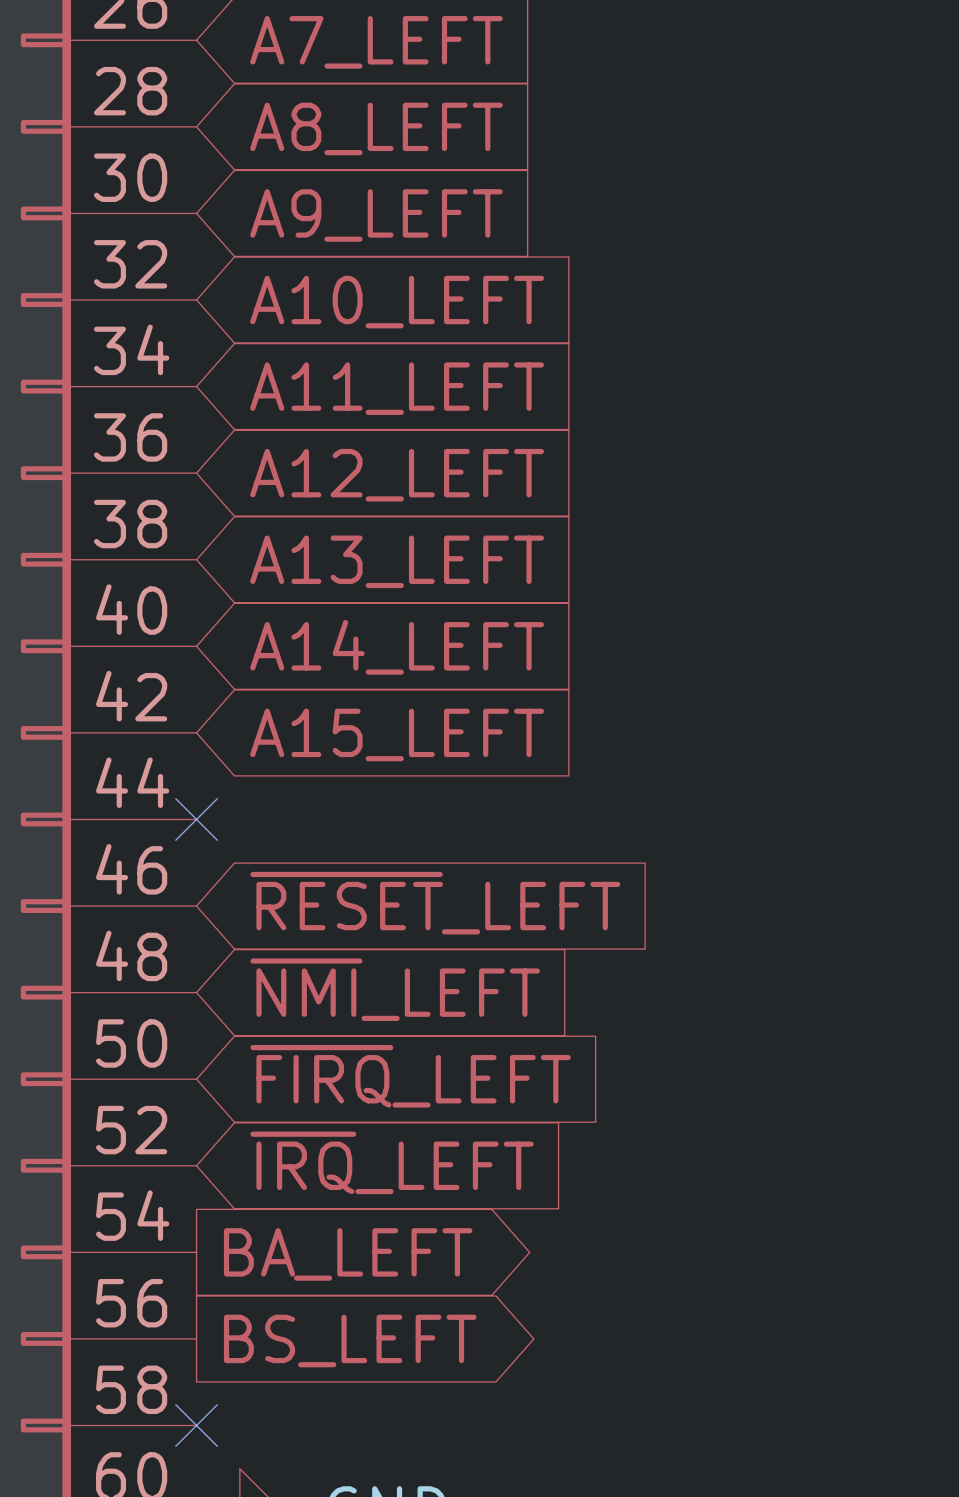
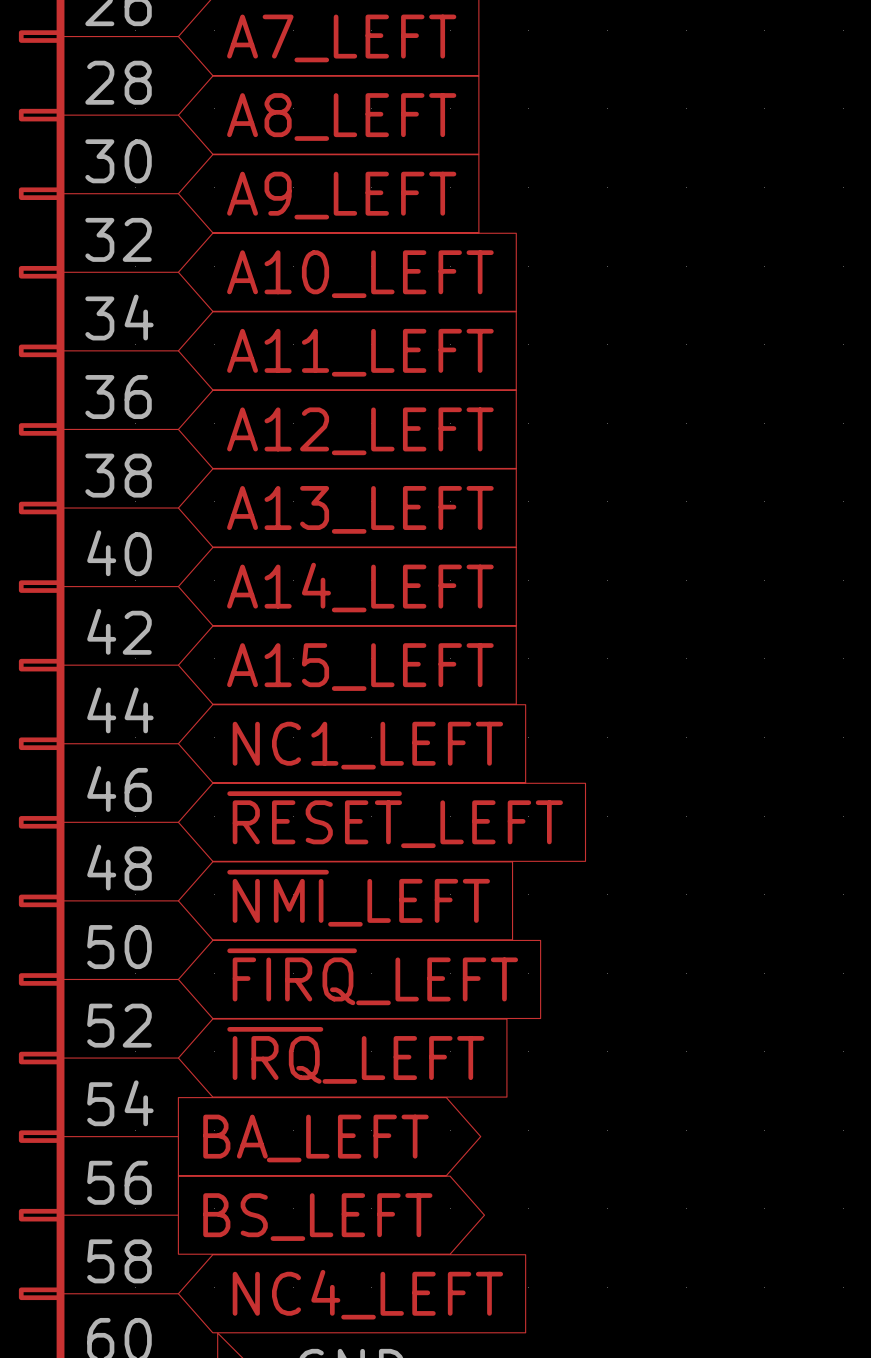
no-connect mark: (196, 819) -> none
global label: none -> NC1_LEFT (367, 745)
no-connect mark: (196, 1425) -> none
global label: none -> NC4_LEFT (367, 1294)

